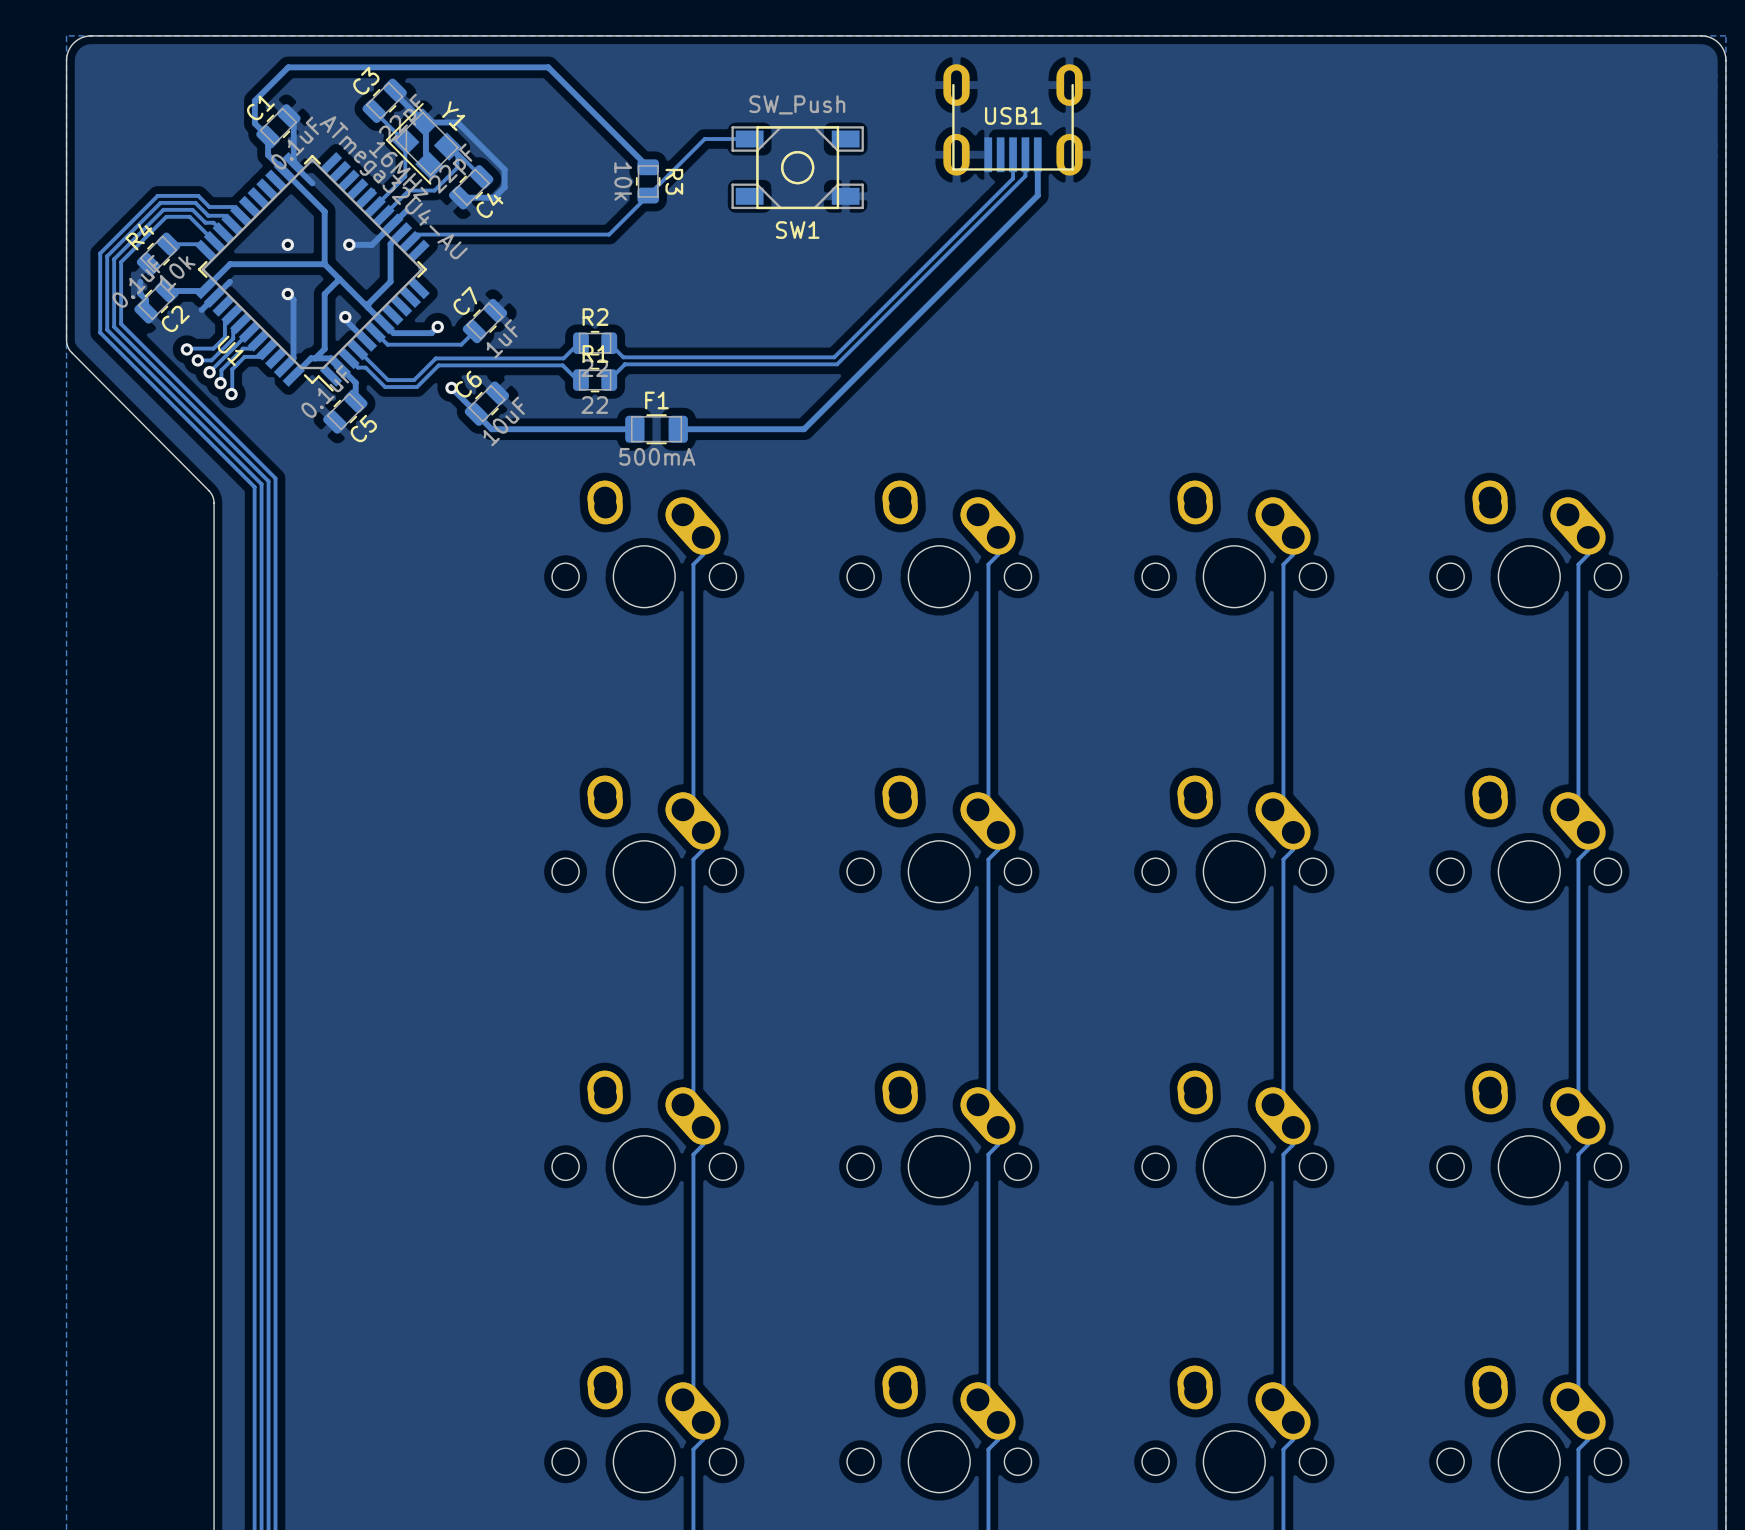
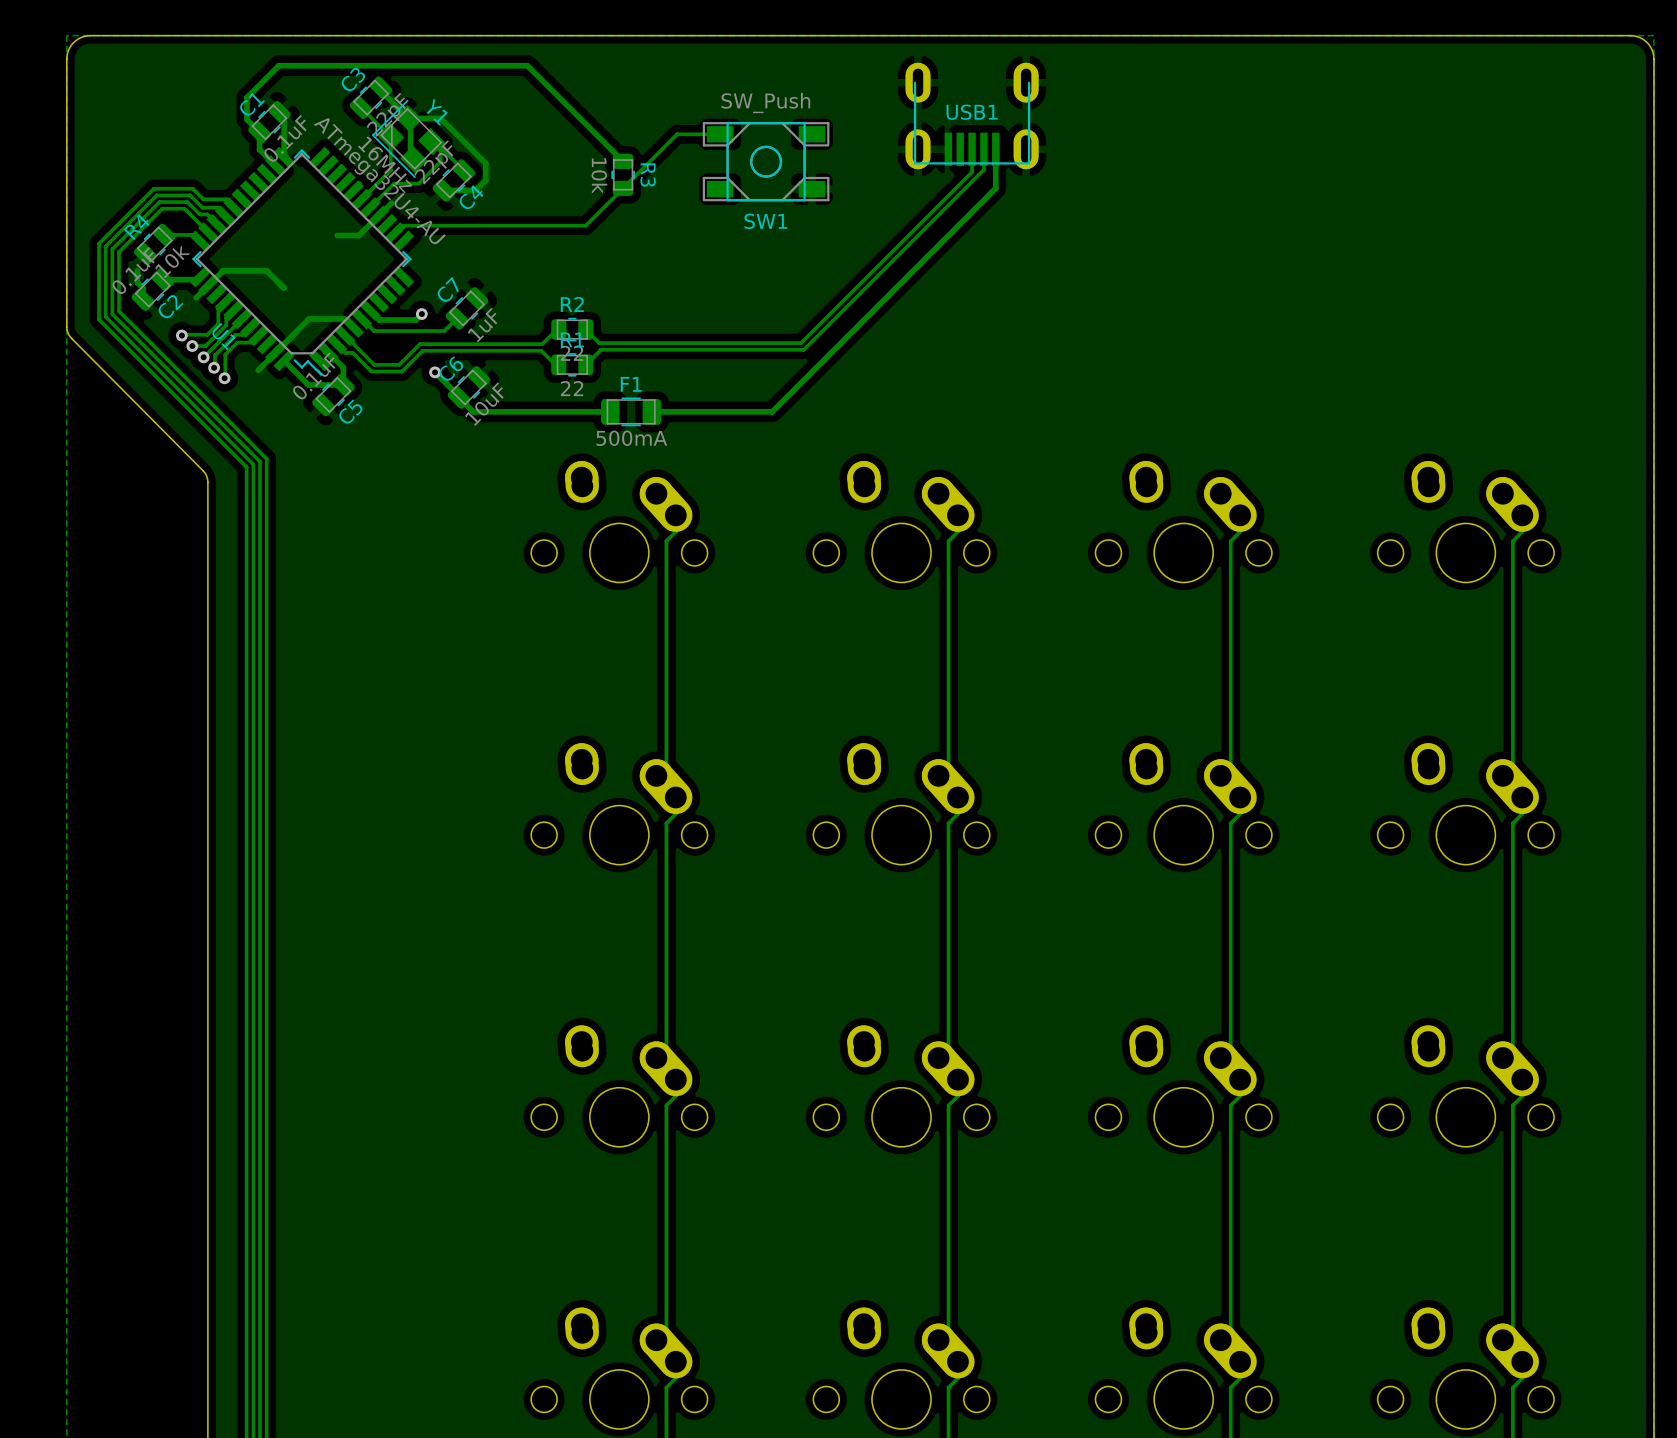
track: (293, 164) (312, 183) -> none
track: (285, 171) (324, 211) (324, 264) -> none
track: (401, 233) (390, 243) (390, 281) (368, 303) (368, 307) -> none
via: (287, 244) -> none
via: (349, 244) -> none
track: (324, 264) (383, 323) -> none
track: (324, 264) (230, 264) (206, 288) -> none
track: (339, 279) (324, 294) (324, 348) (315, 358) -> none
track: none -> (223, 270) (266, 270) (278, 282)
via: (287, 294) -> none
track: (293, 299) (293, 358) -> none
via: (345, 317) -> none
track: (349, 323) (366, 340) -> (295, 332) (283, 344) (309, 318) (344, 318) (353, 327)
track: none -> (275, 352) (258, 370)
track: (339, 366) (331, 358) (311, 358) (293, 375) -> (343, 384) (308, 384) (284, 360)

